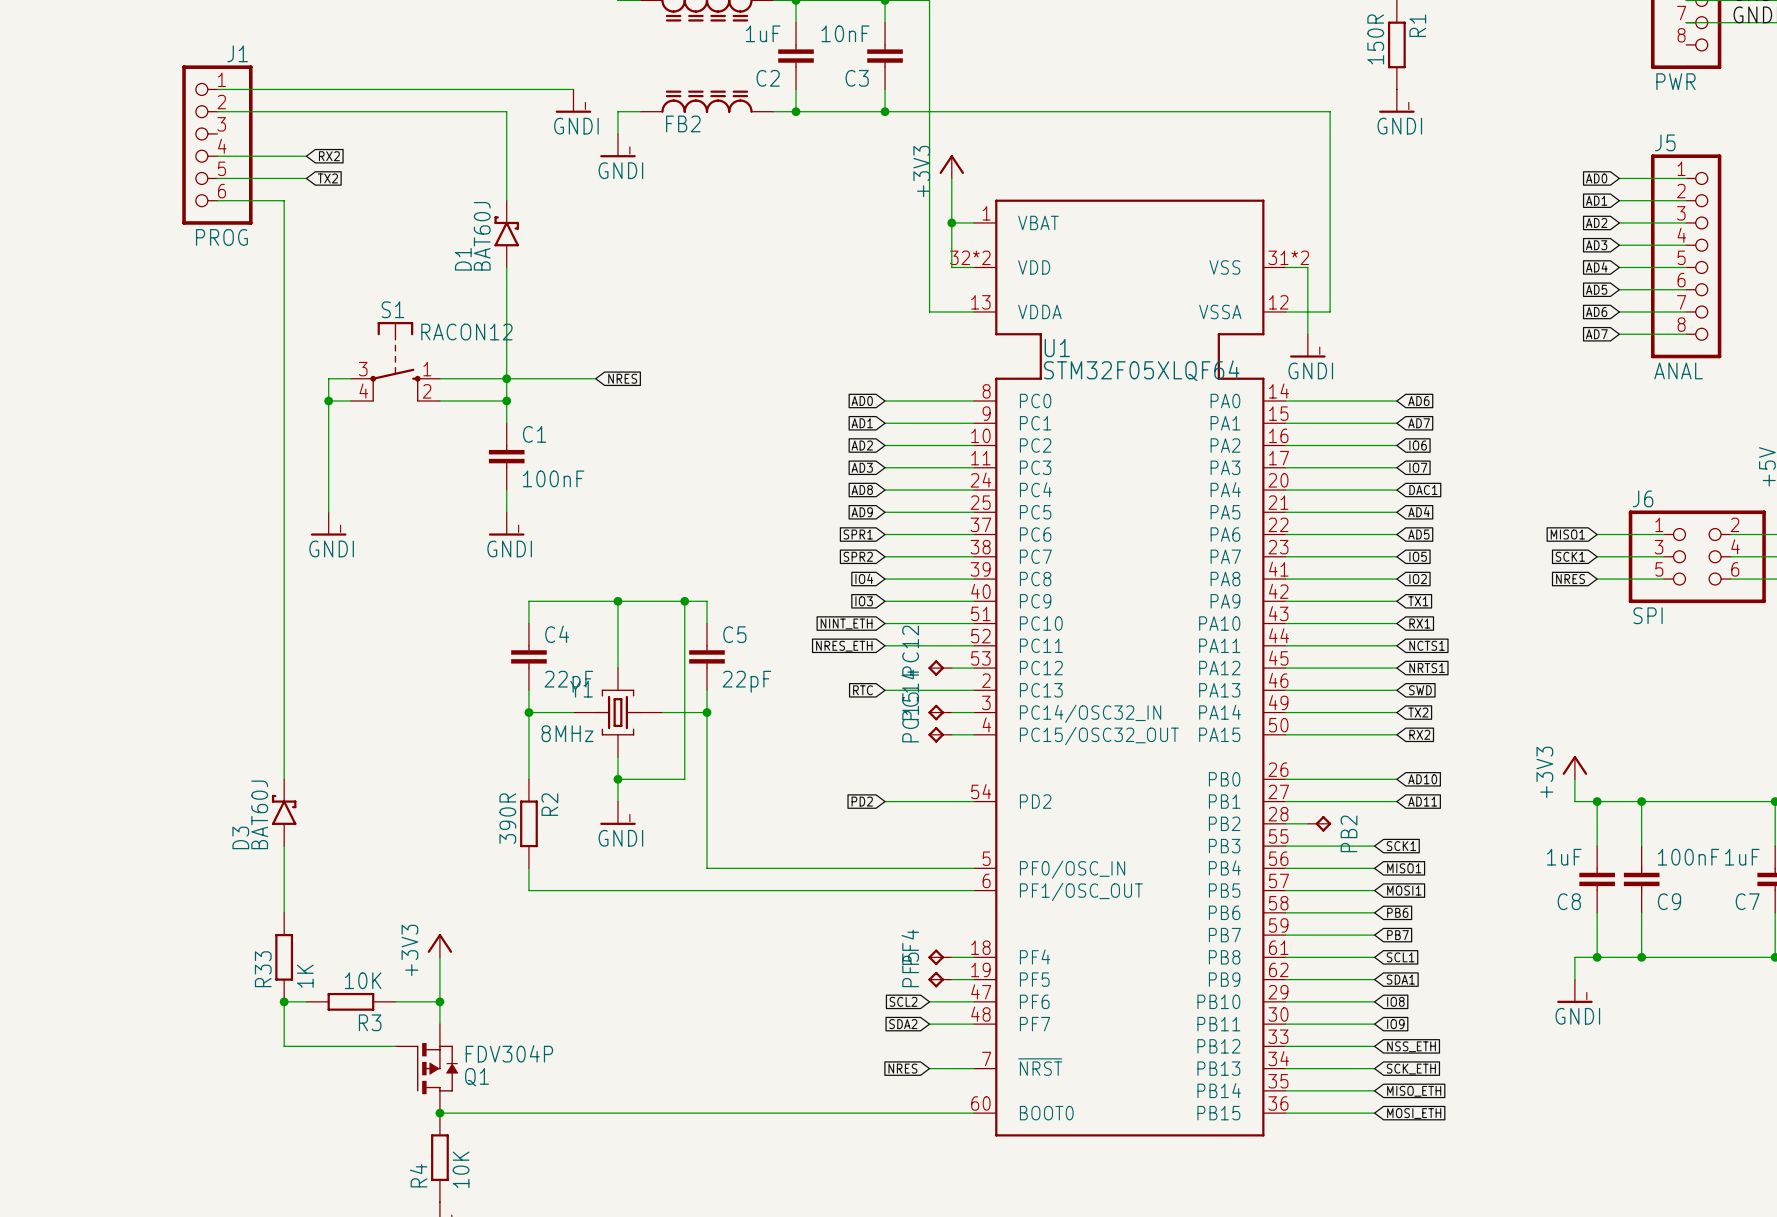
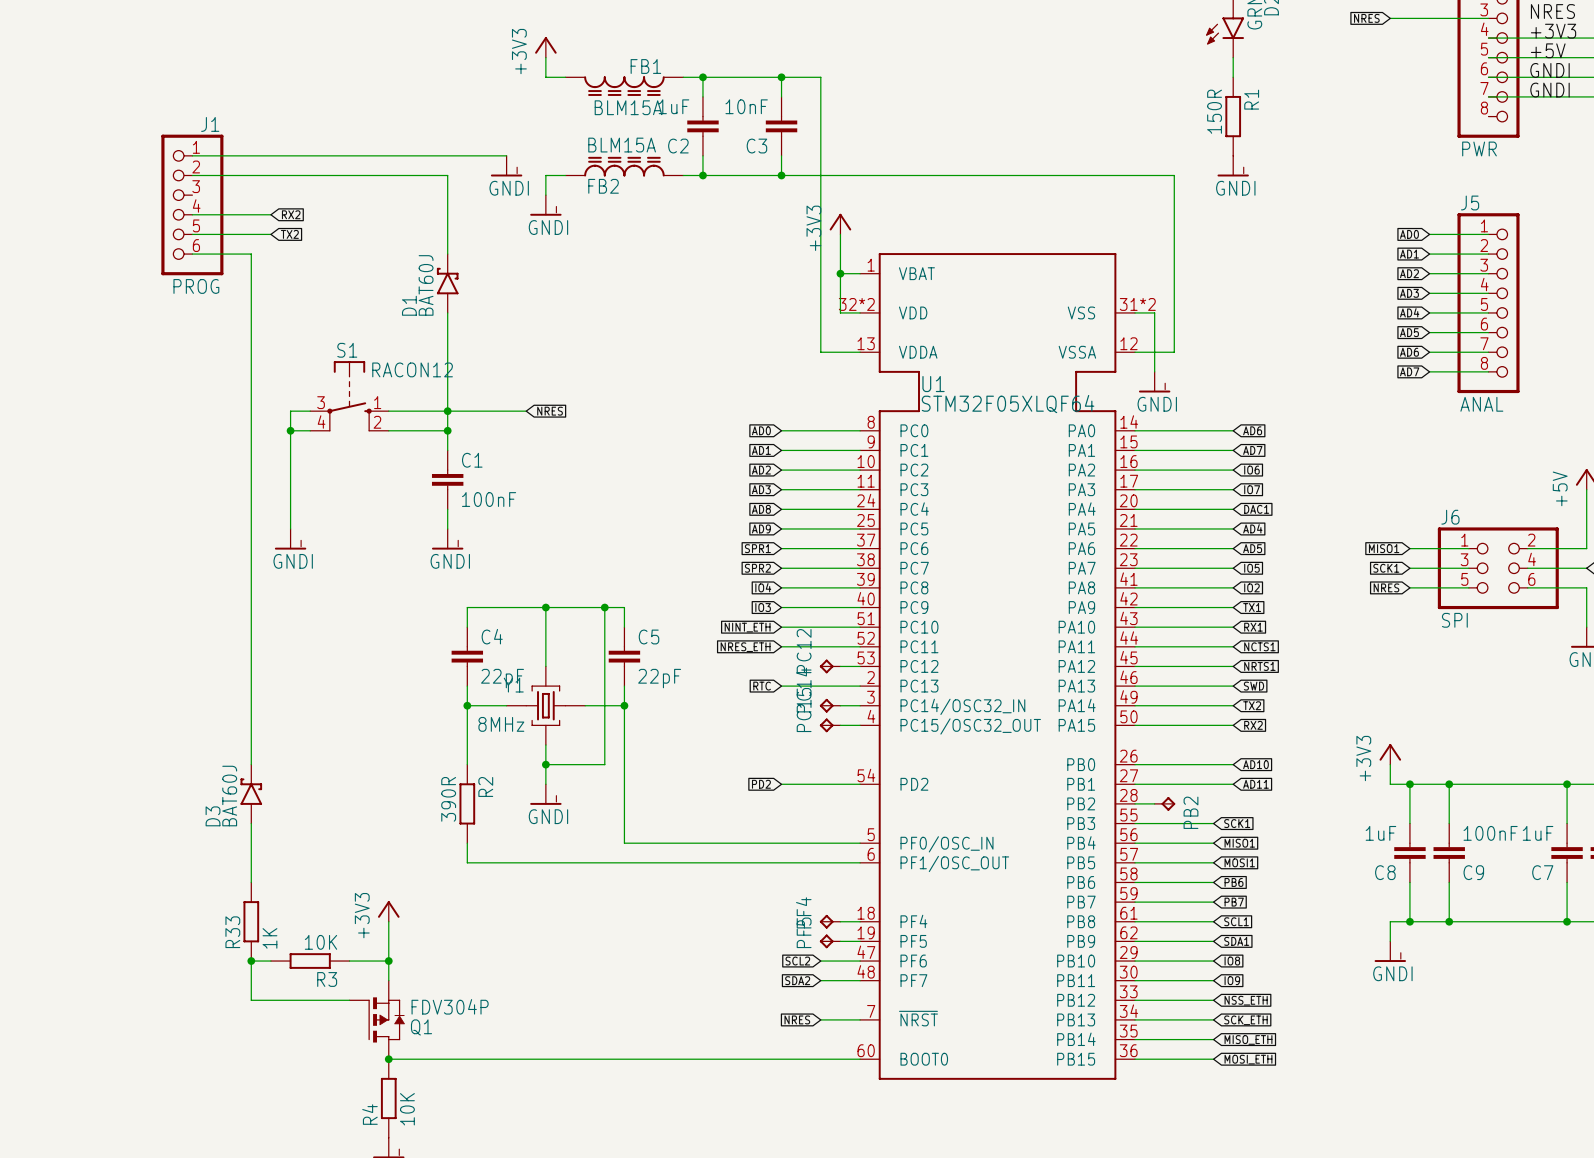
FB1 value: none -> BLM15A (628, 107)
FB2 value: none -> BLM15A (622, 145)

